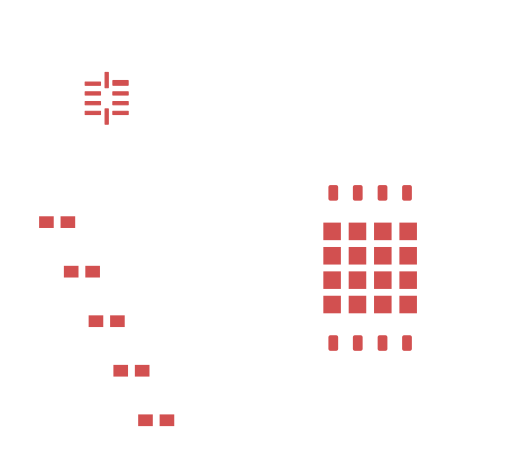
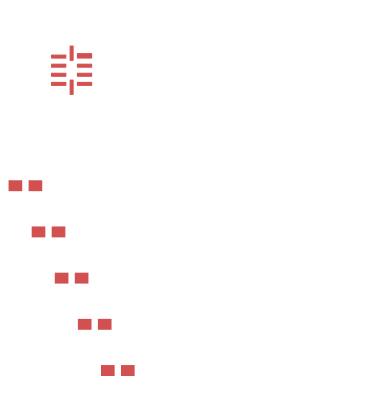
part: (370, 267) -> none

